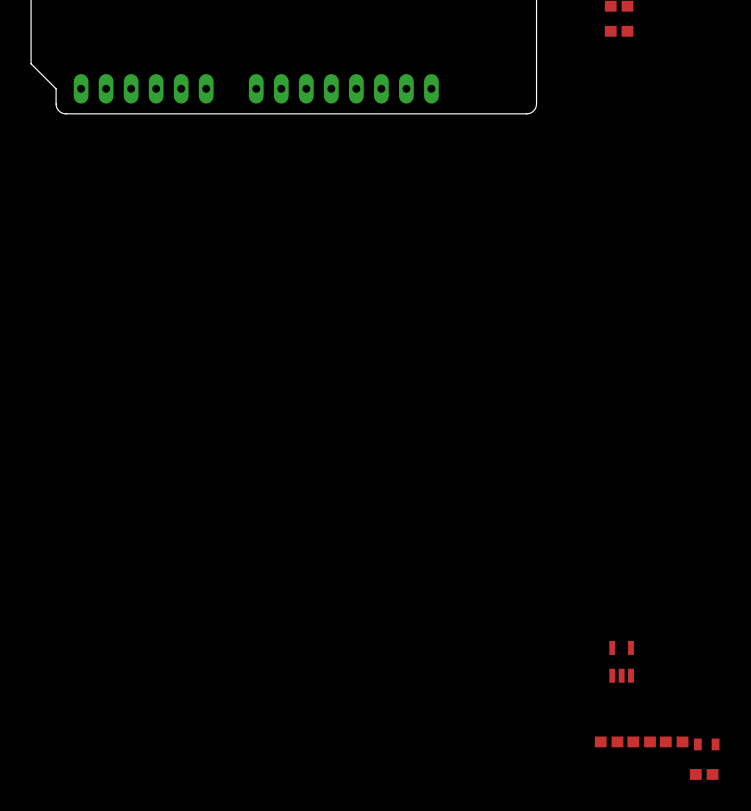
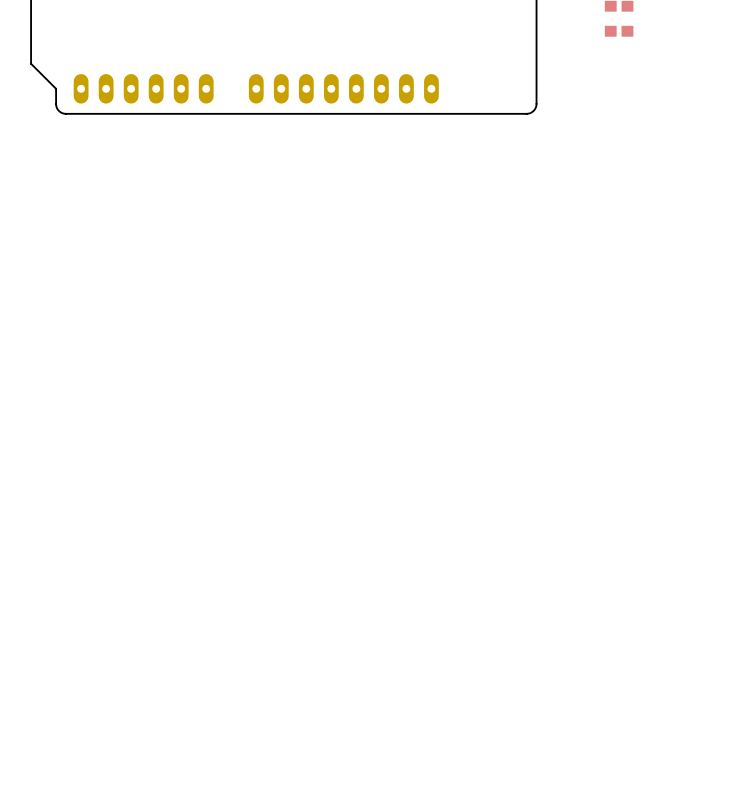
part: (621, 661) -> none
part: (609, 741) -> none
part: (641, 741) -> none
part: (674, 741) -> none
part: (706, 744) -> none
part: (704, 774) -> none

